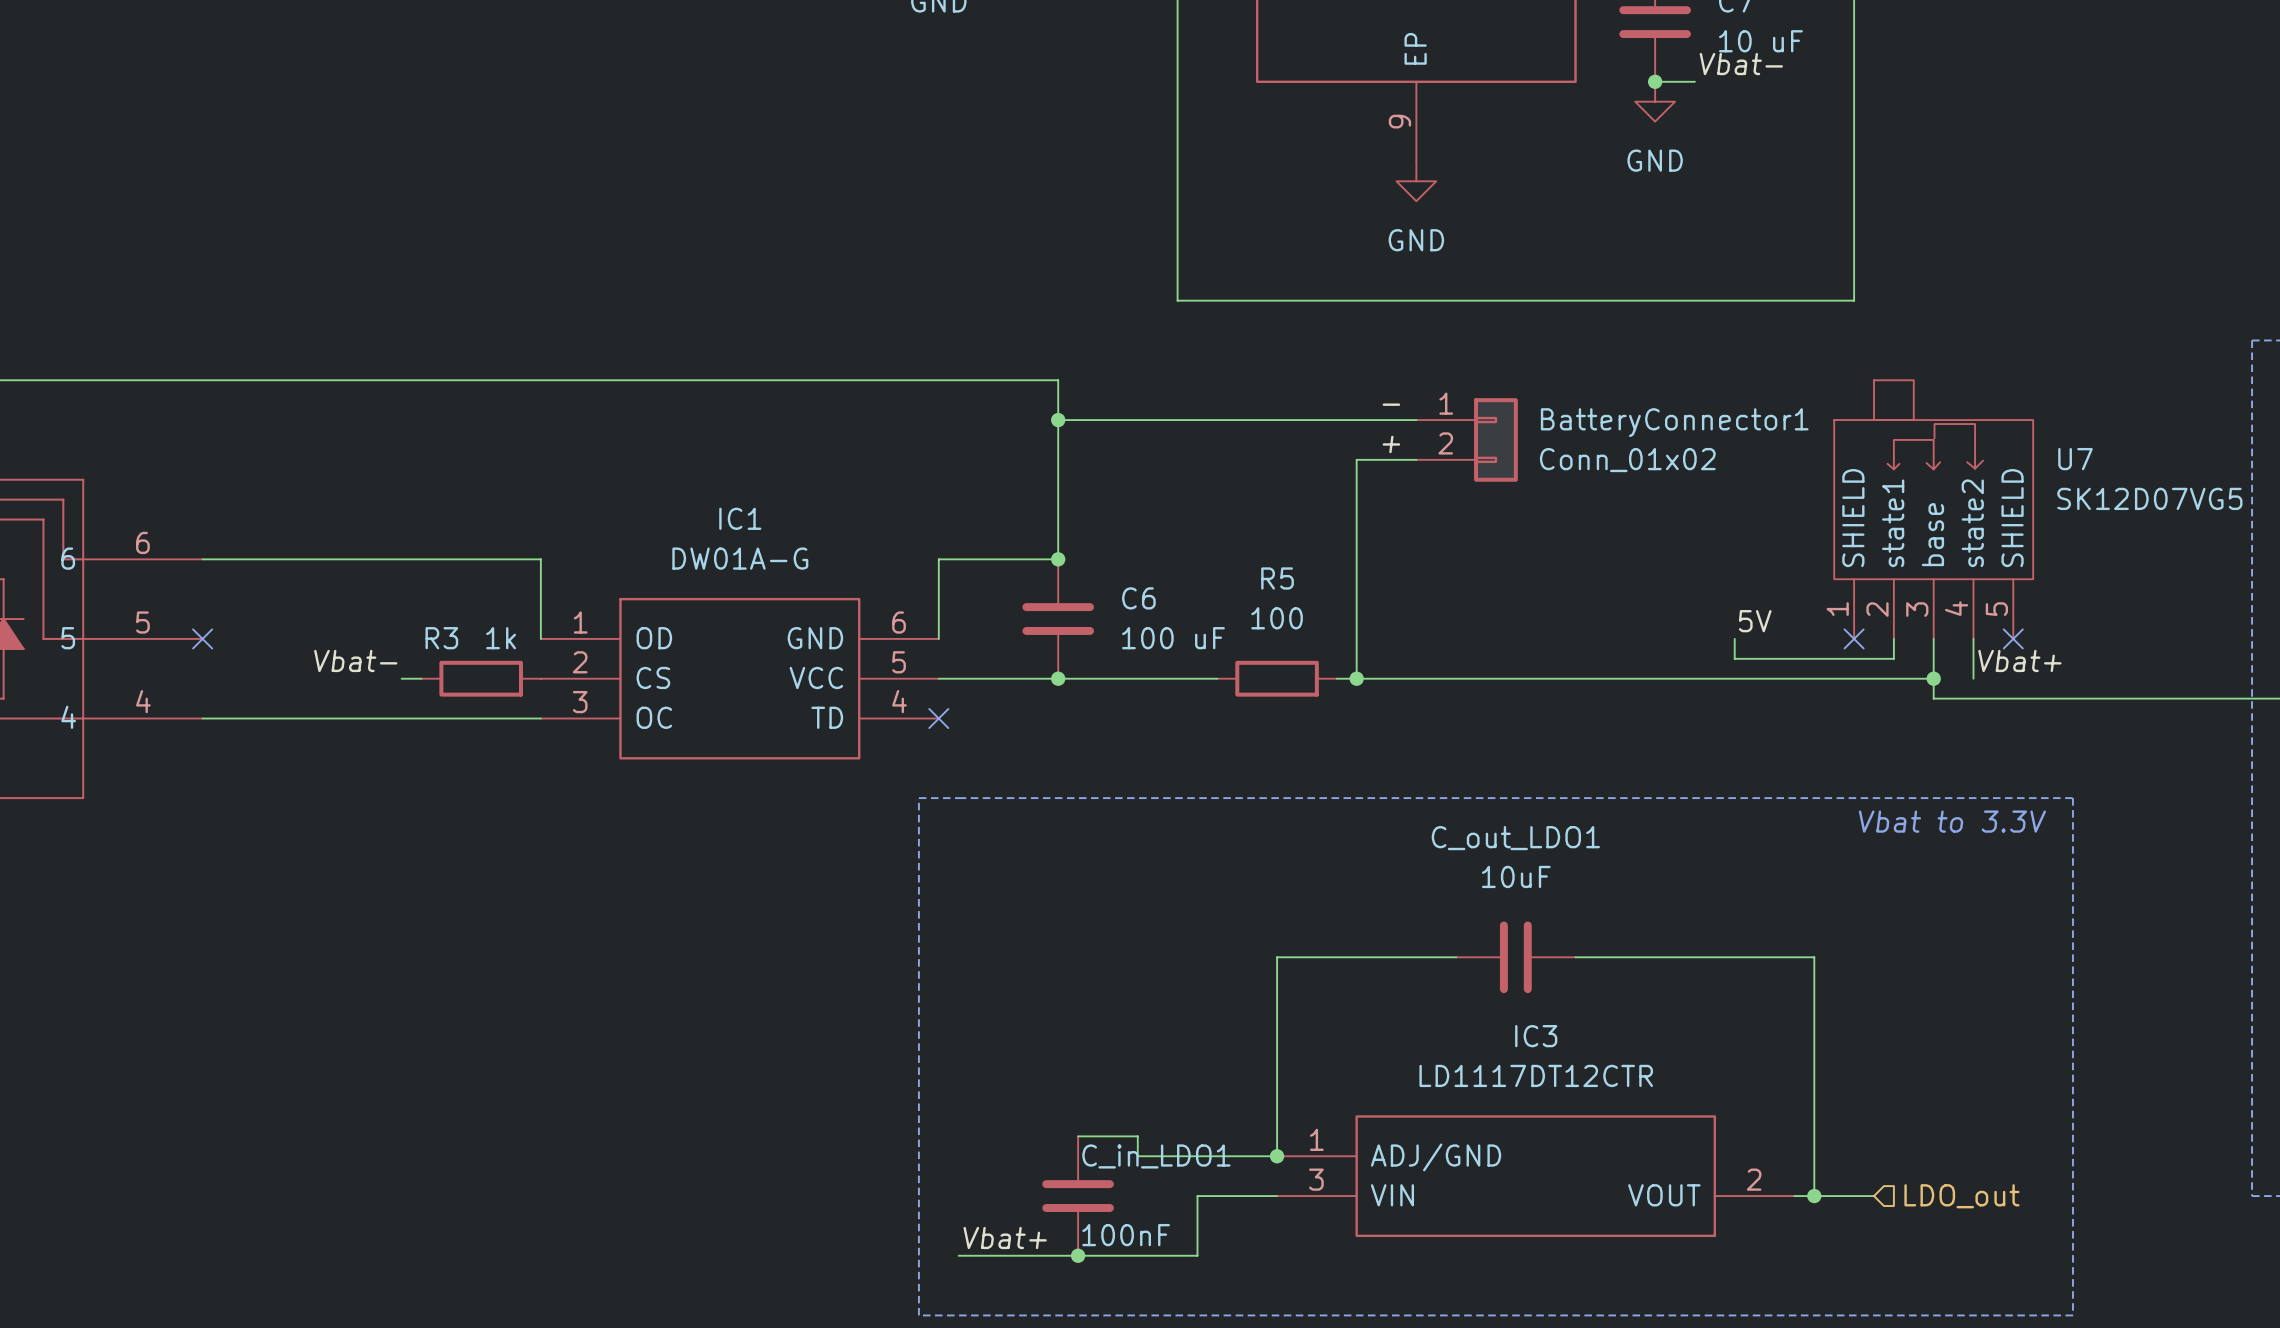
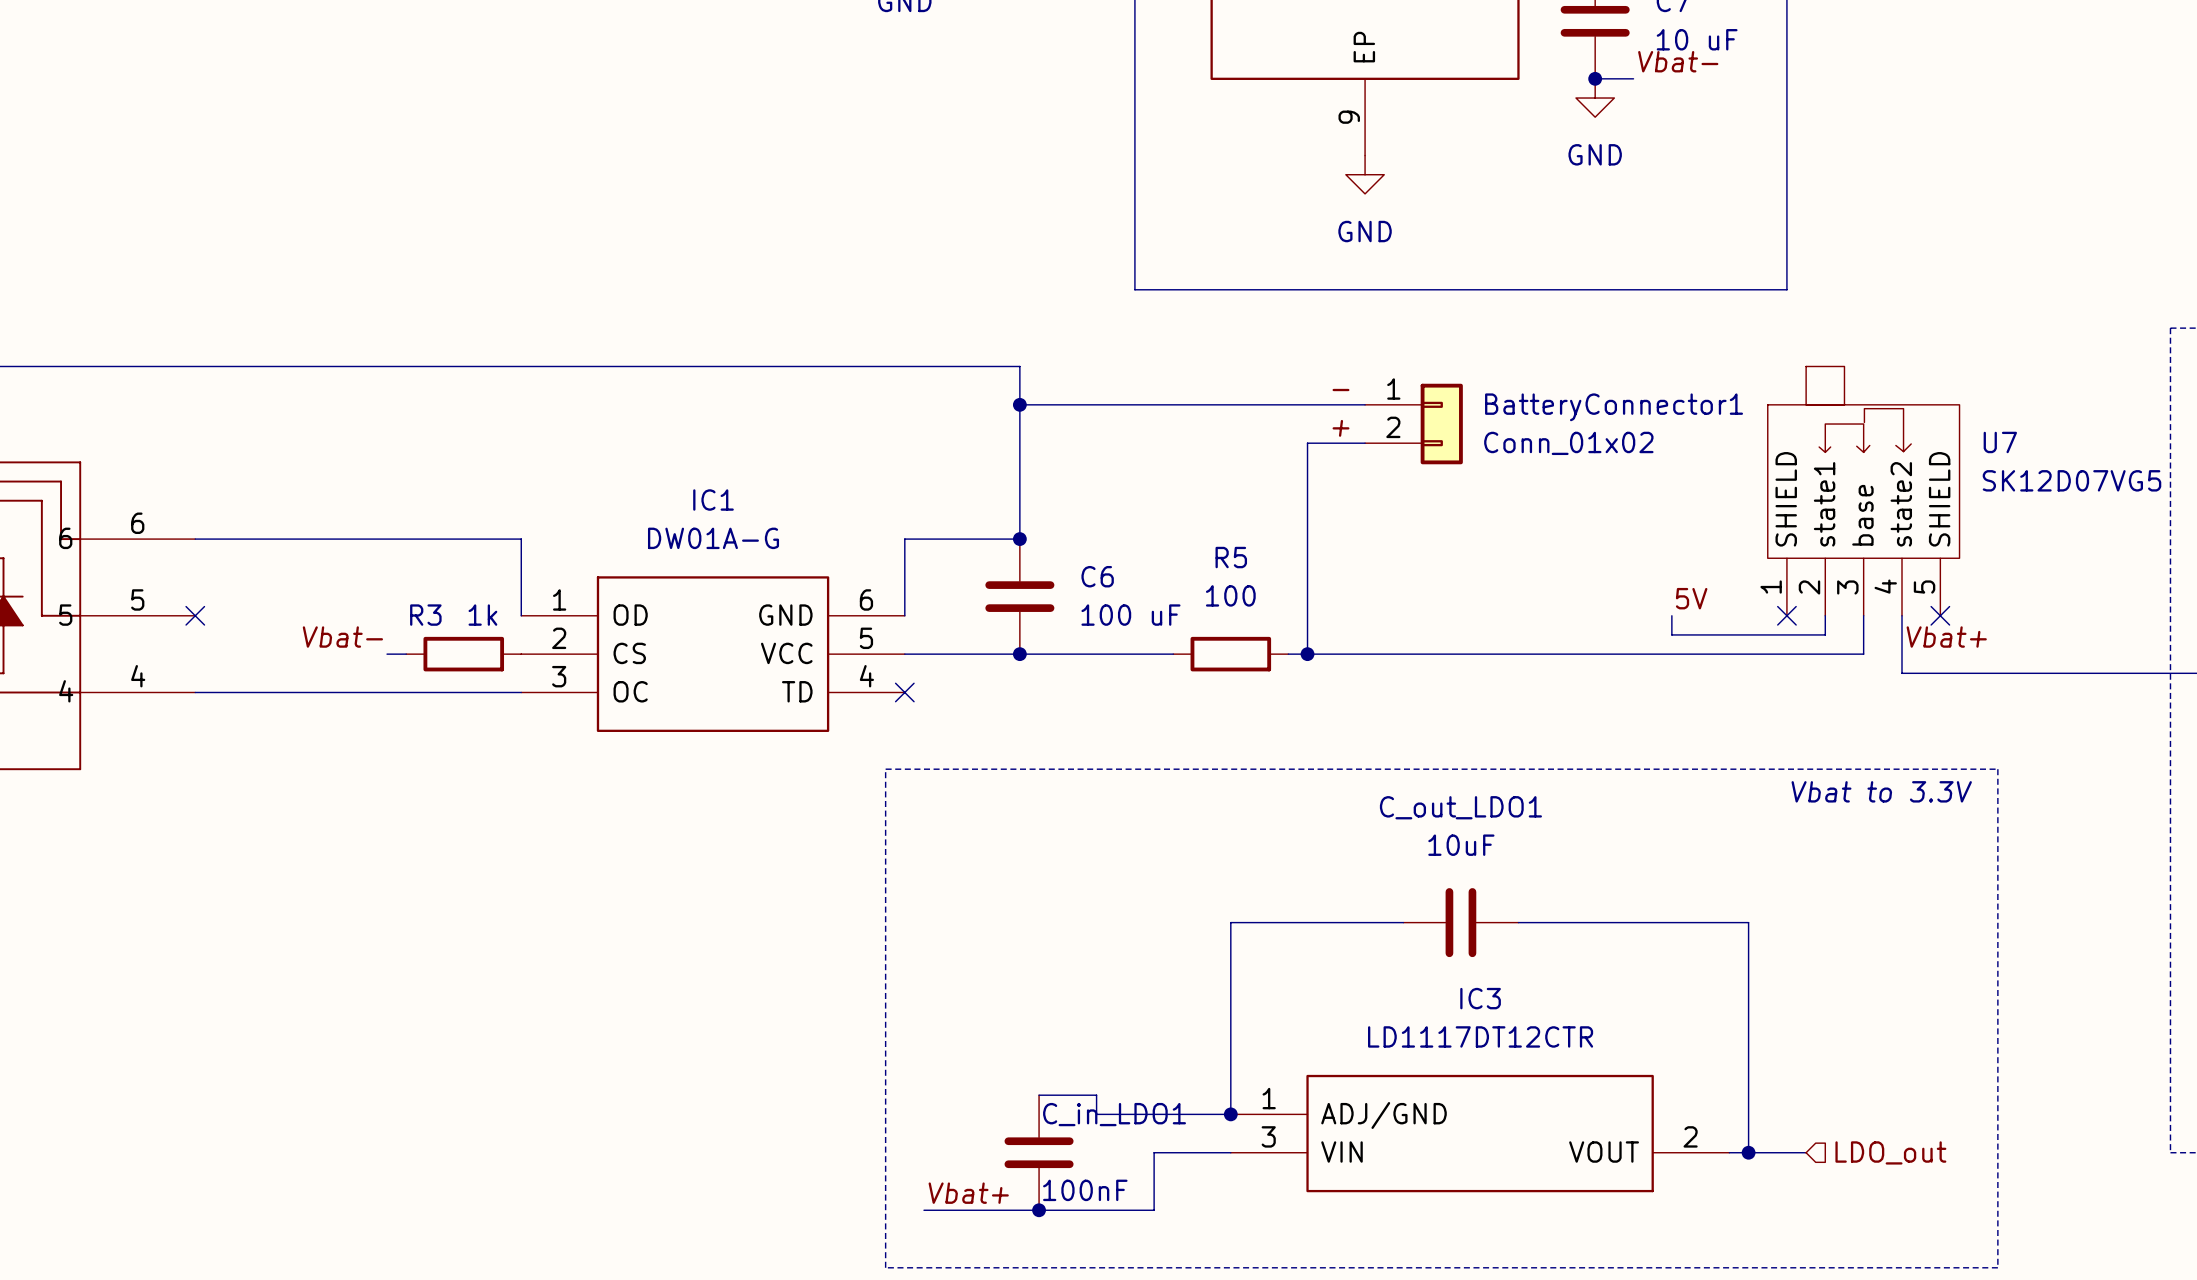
wire: (1933, 678) (1933, 698) (1973, 698) -> (1902, 654) (1902, 673)
junction: (1933, 678) -> none

